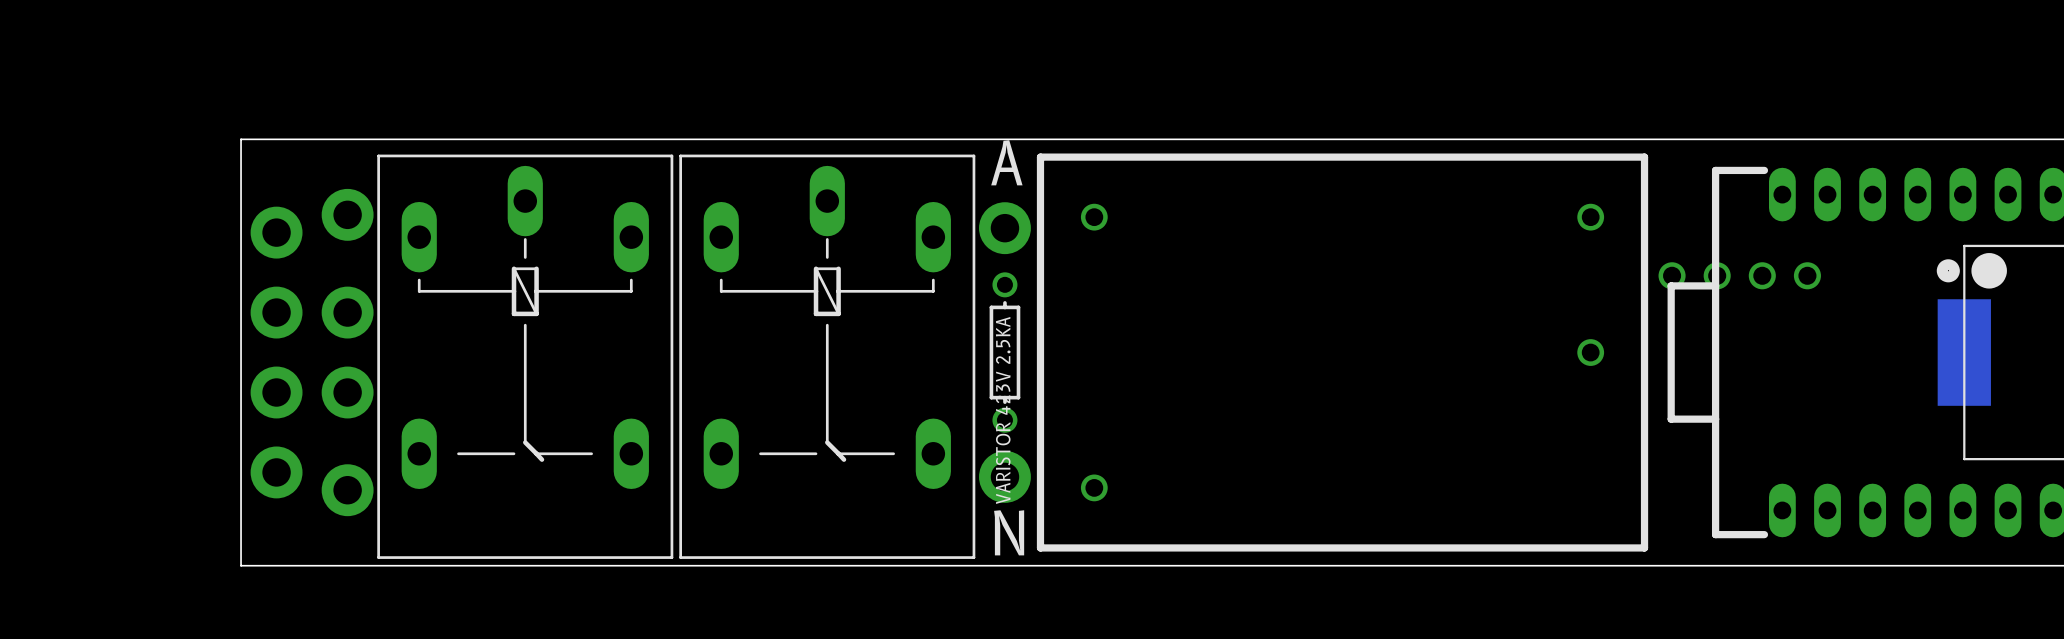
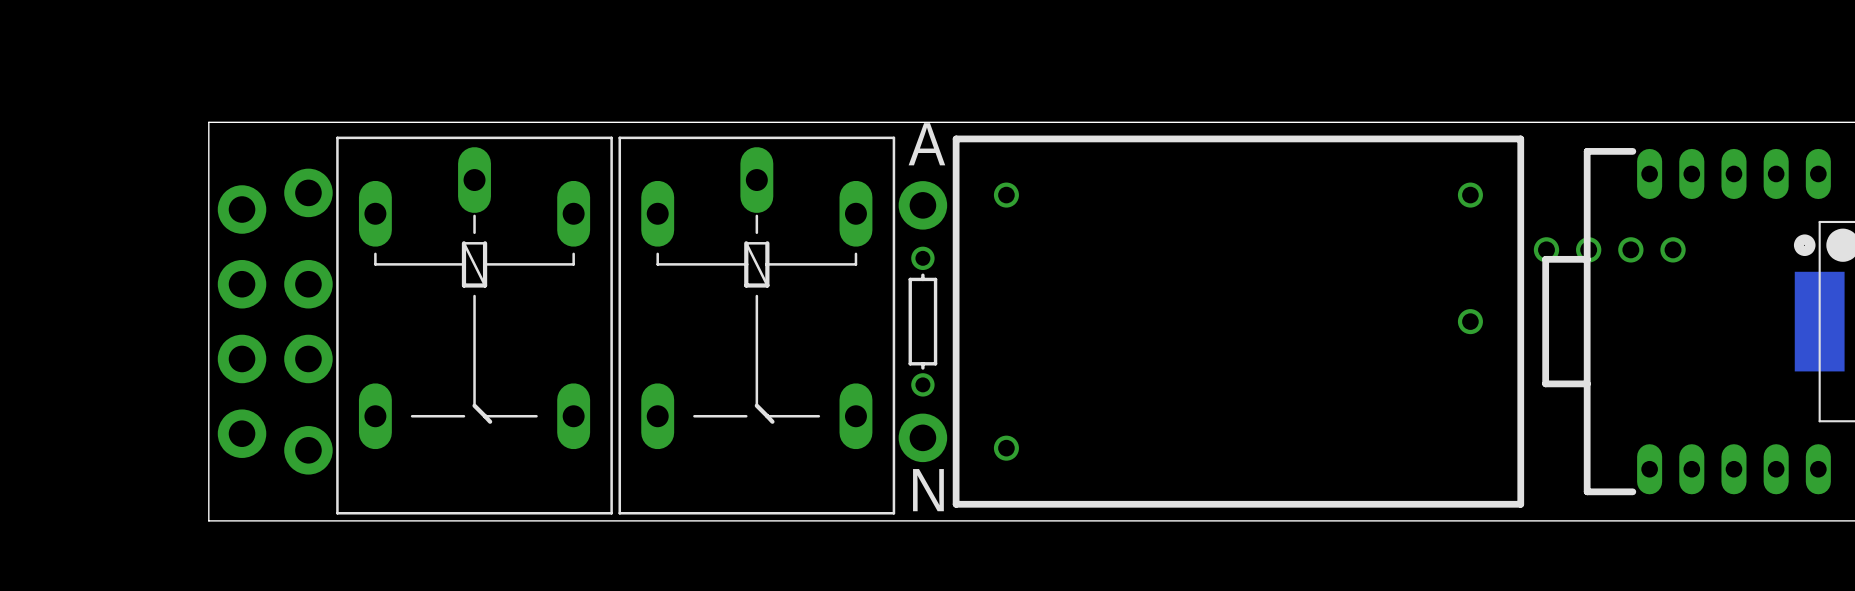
part value: VARISTOR 423V 2.5KA (1003, 410) -> none

